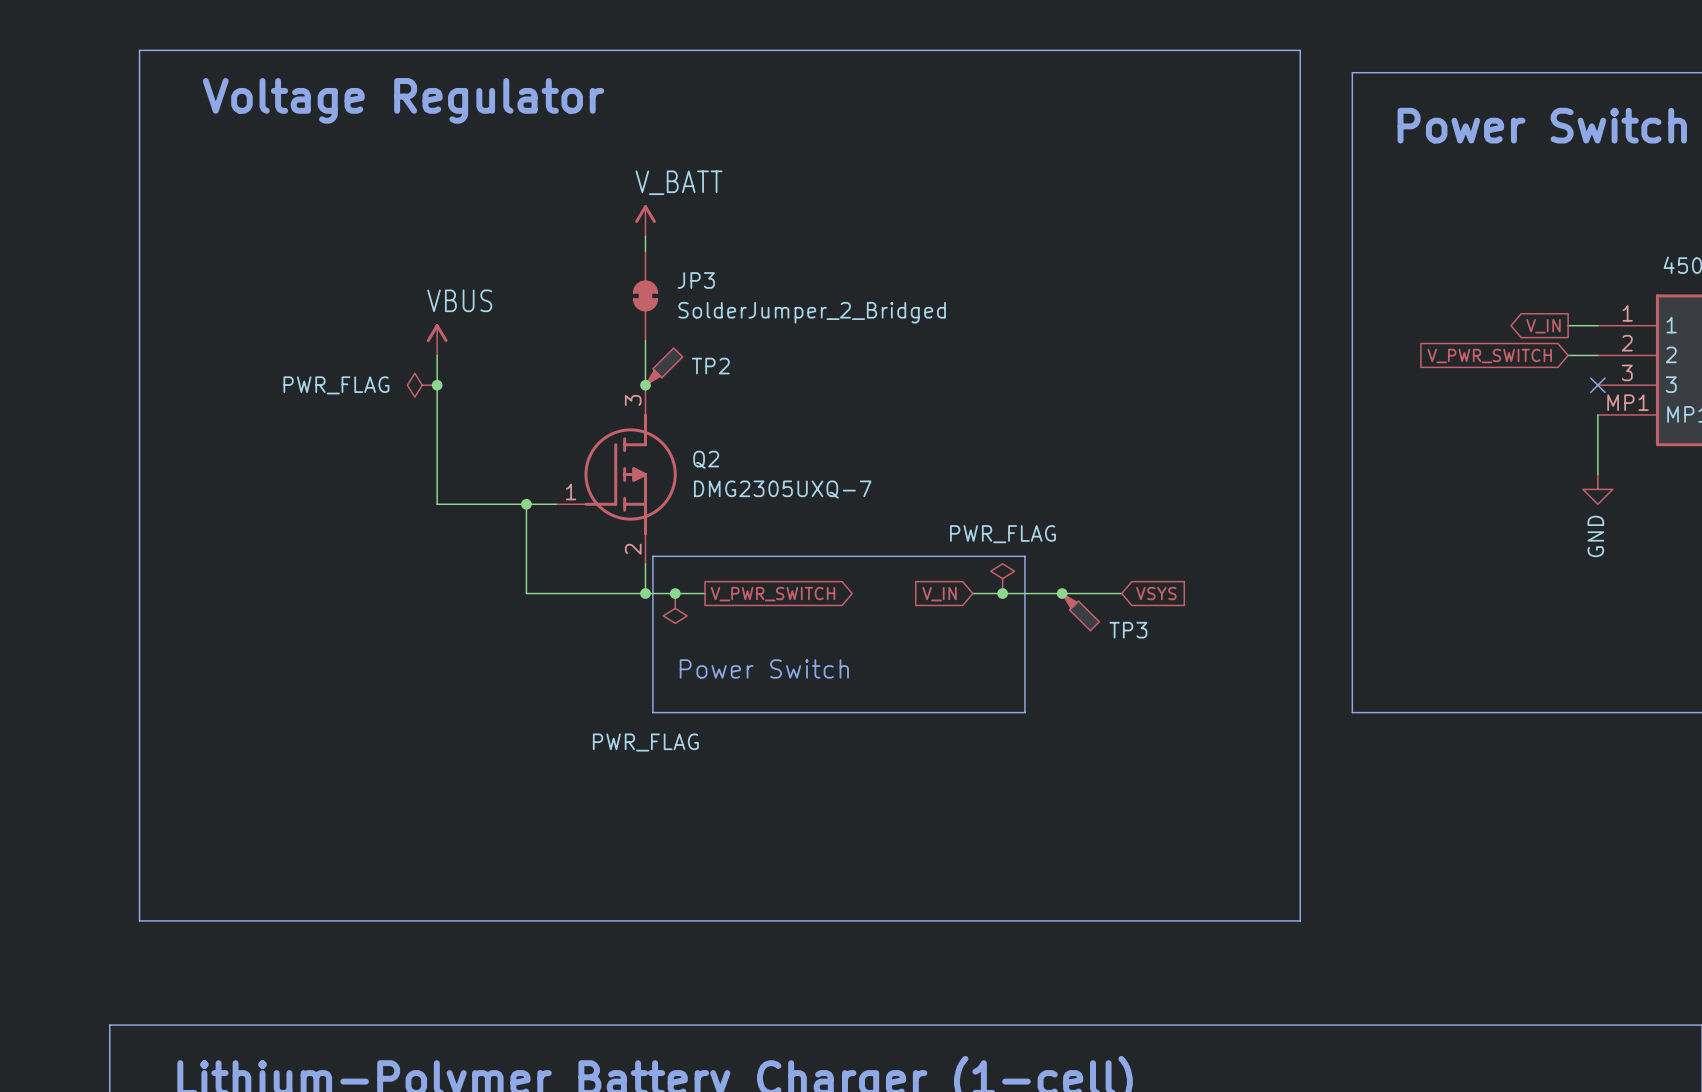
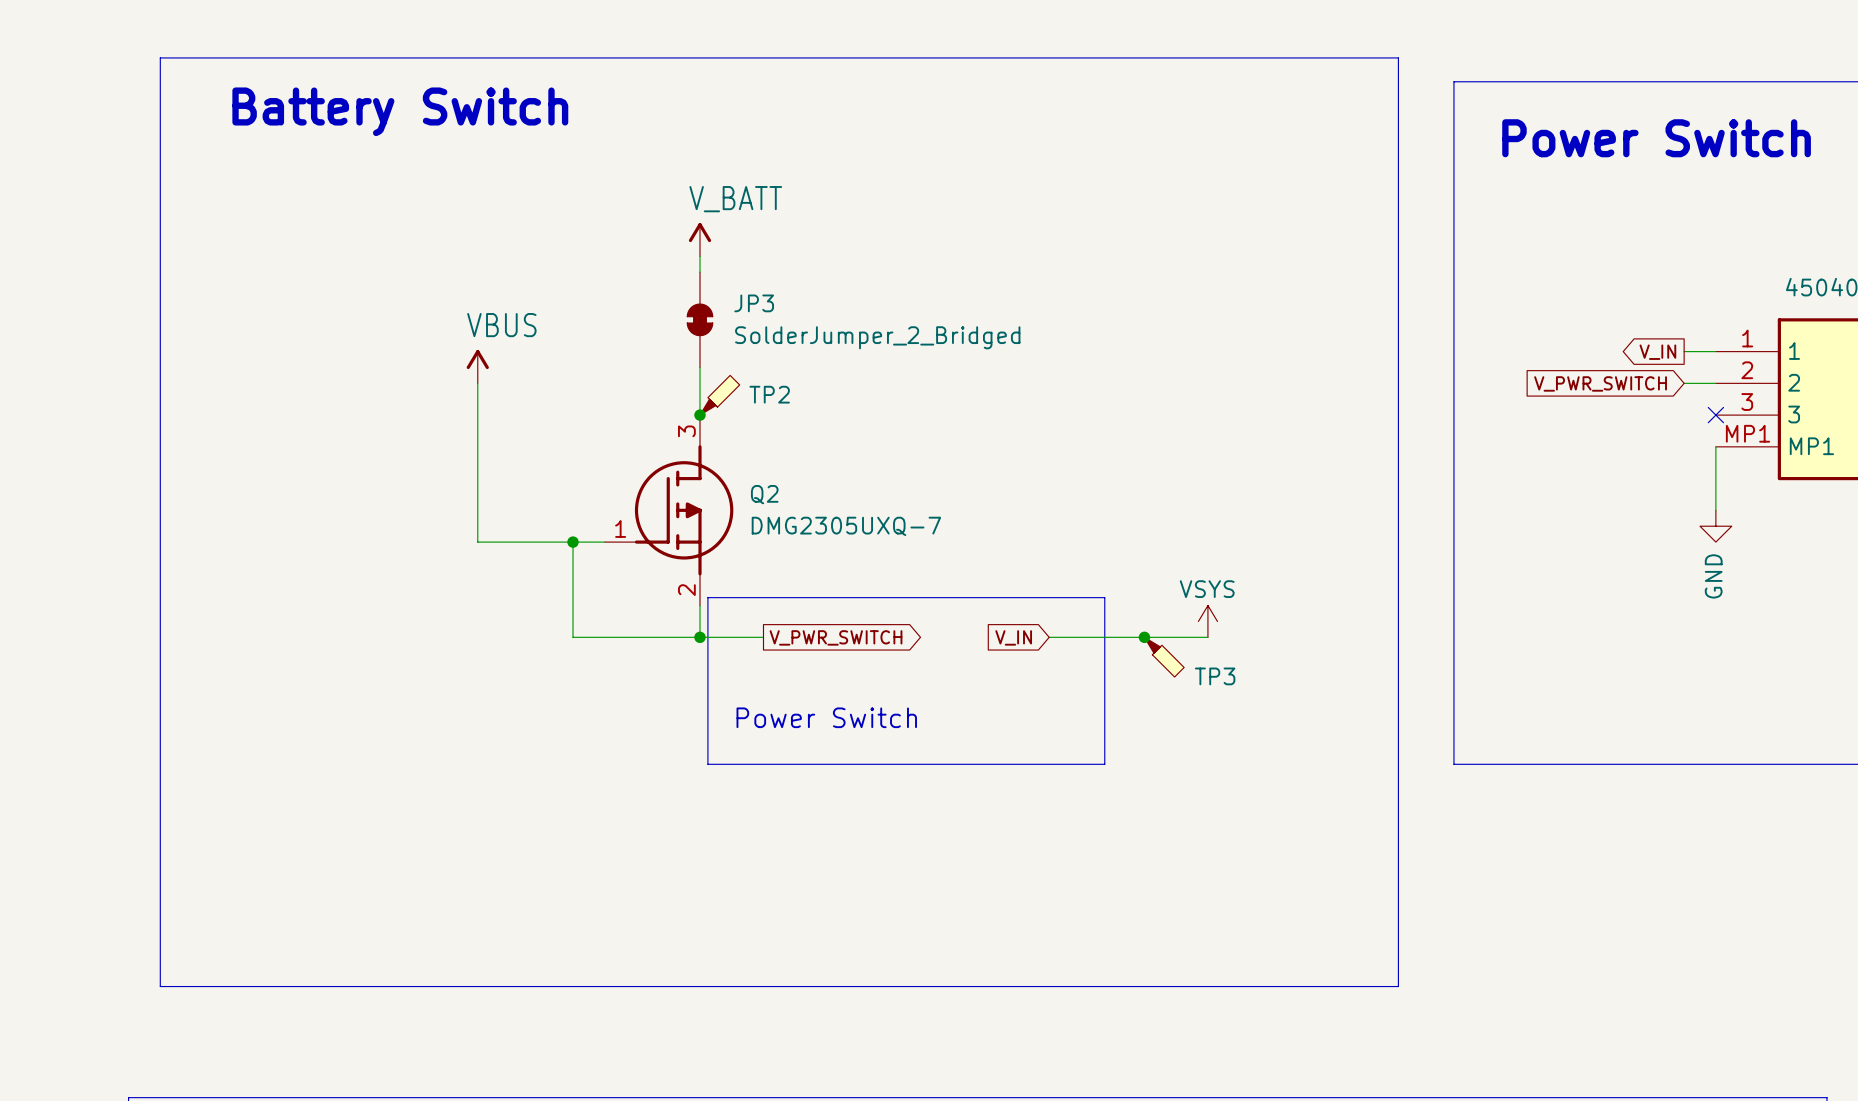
text: Voltage Regulator (403, 100) -> Battery Switch (400, 111)
power symbol: PWR_FLAG (422, 385) -> none
junction: (437, 385) -> none
power symbol: PWR_FLAG (1002, 578) -> none
power symbol: none -> VSYS (1207, 621)
junction: (675, 593) -> none
junction: (1002, 593) -> none
global label: VSYS (1156, 593) -> none
power symbol: PWR_FLAG (675, 608) -> none

